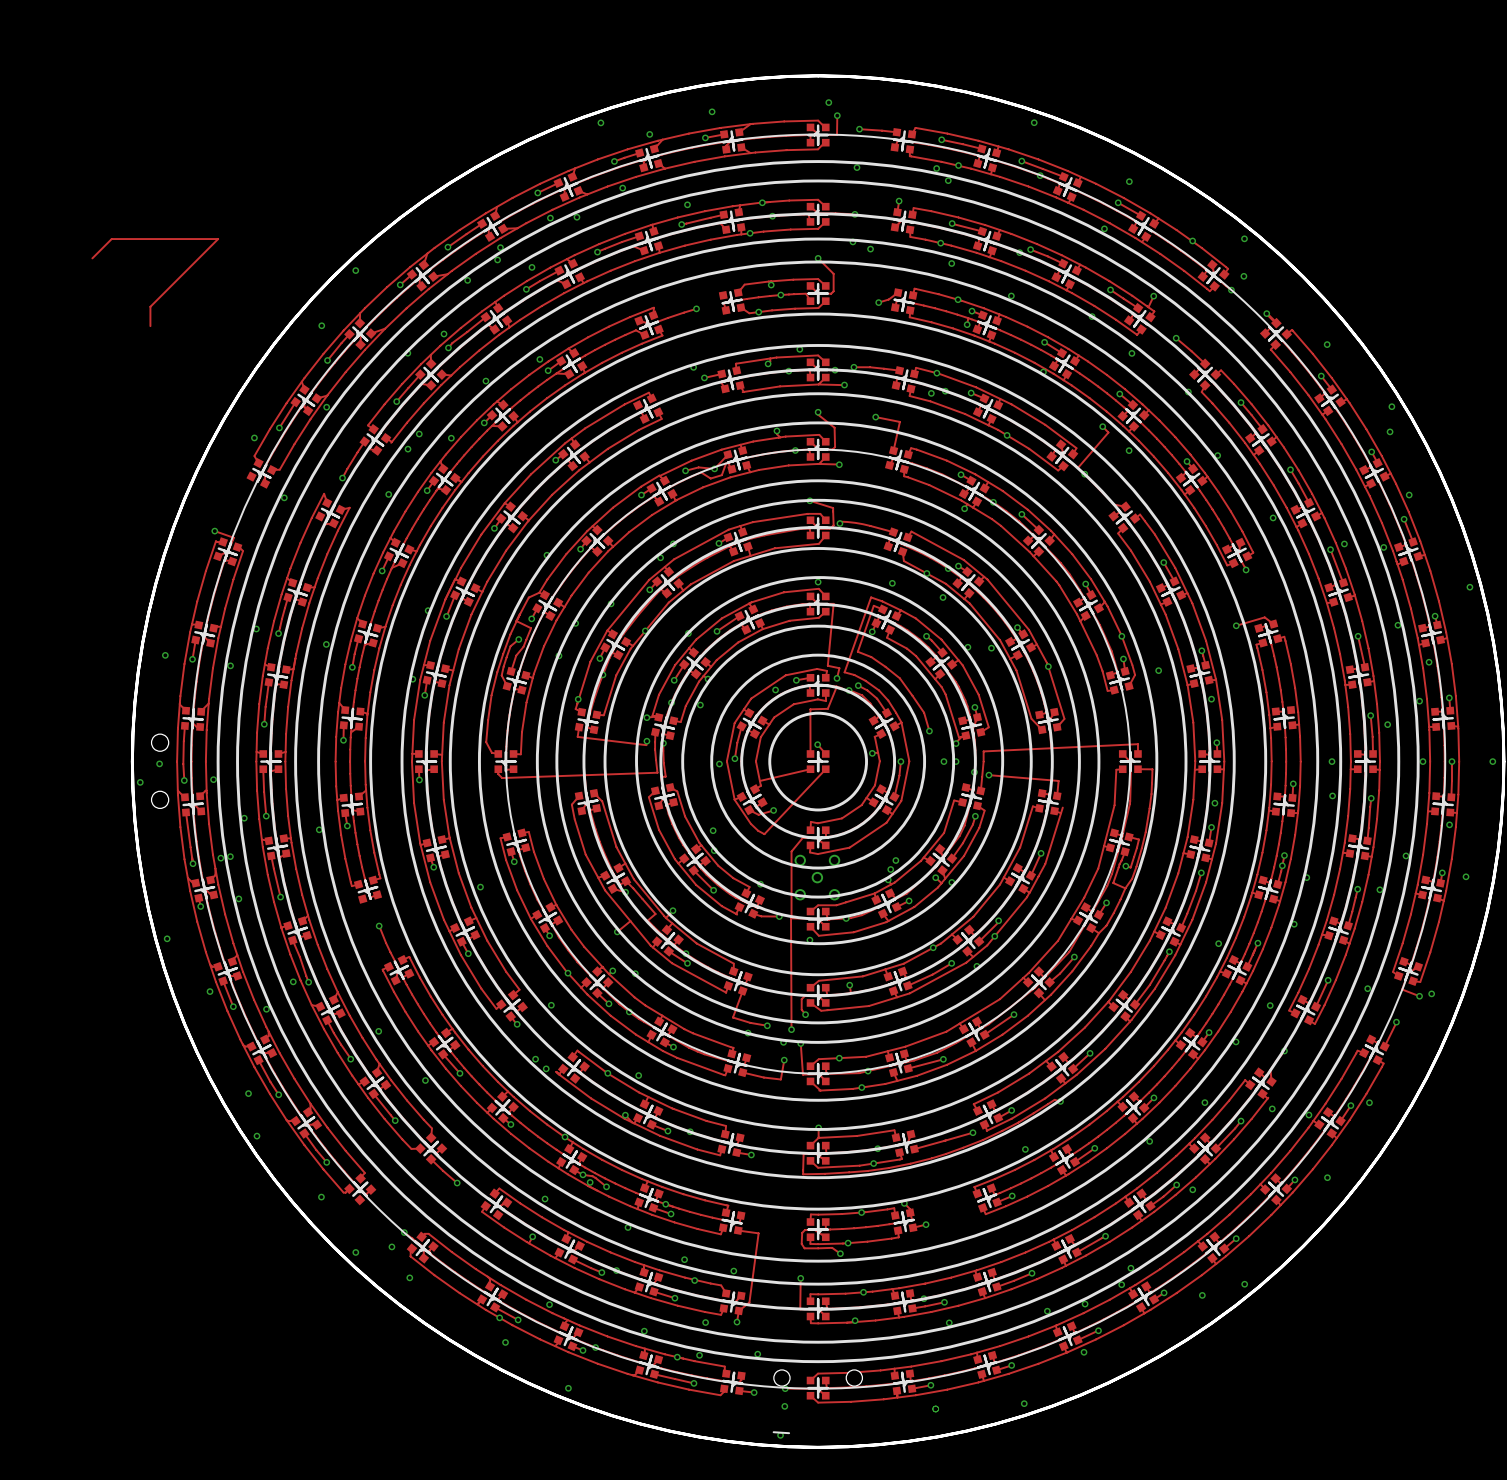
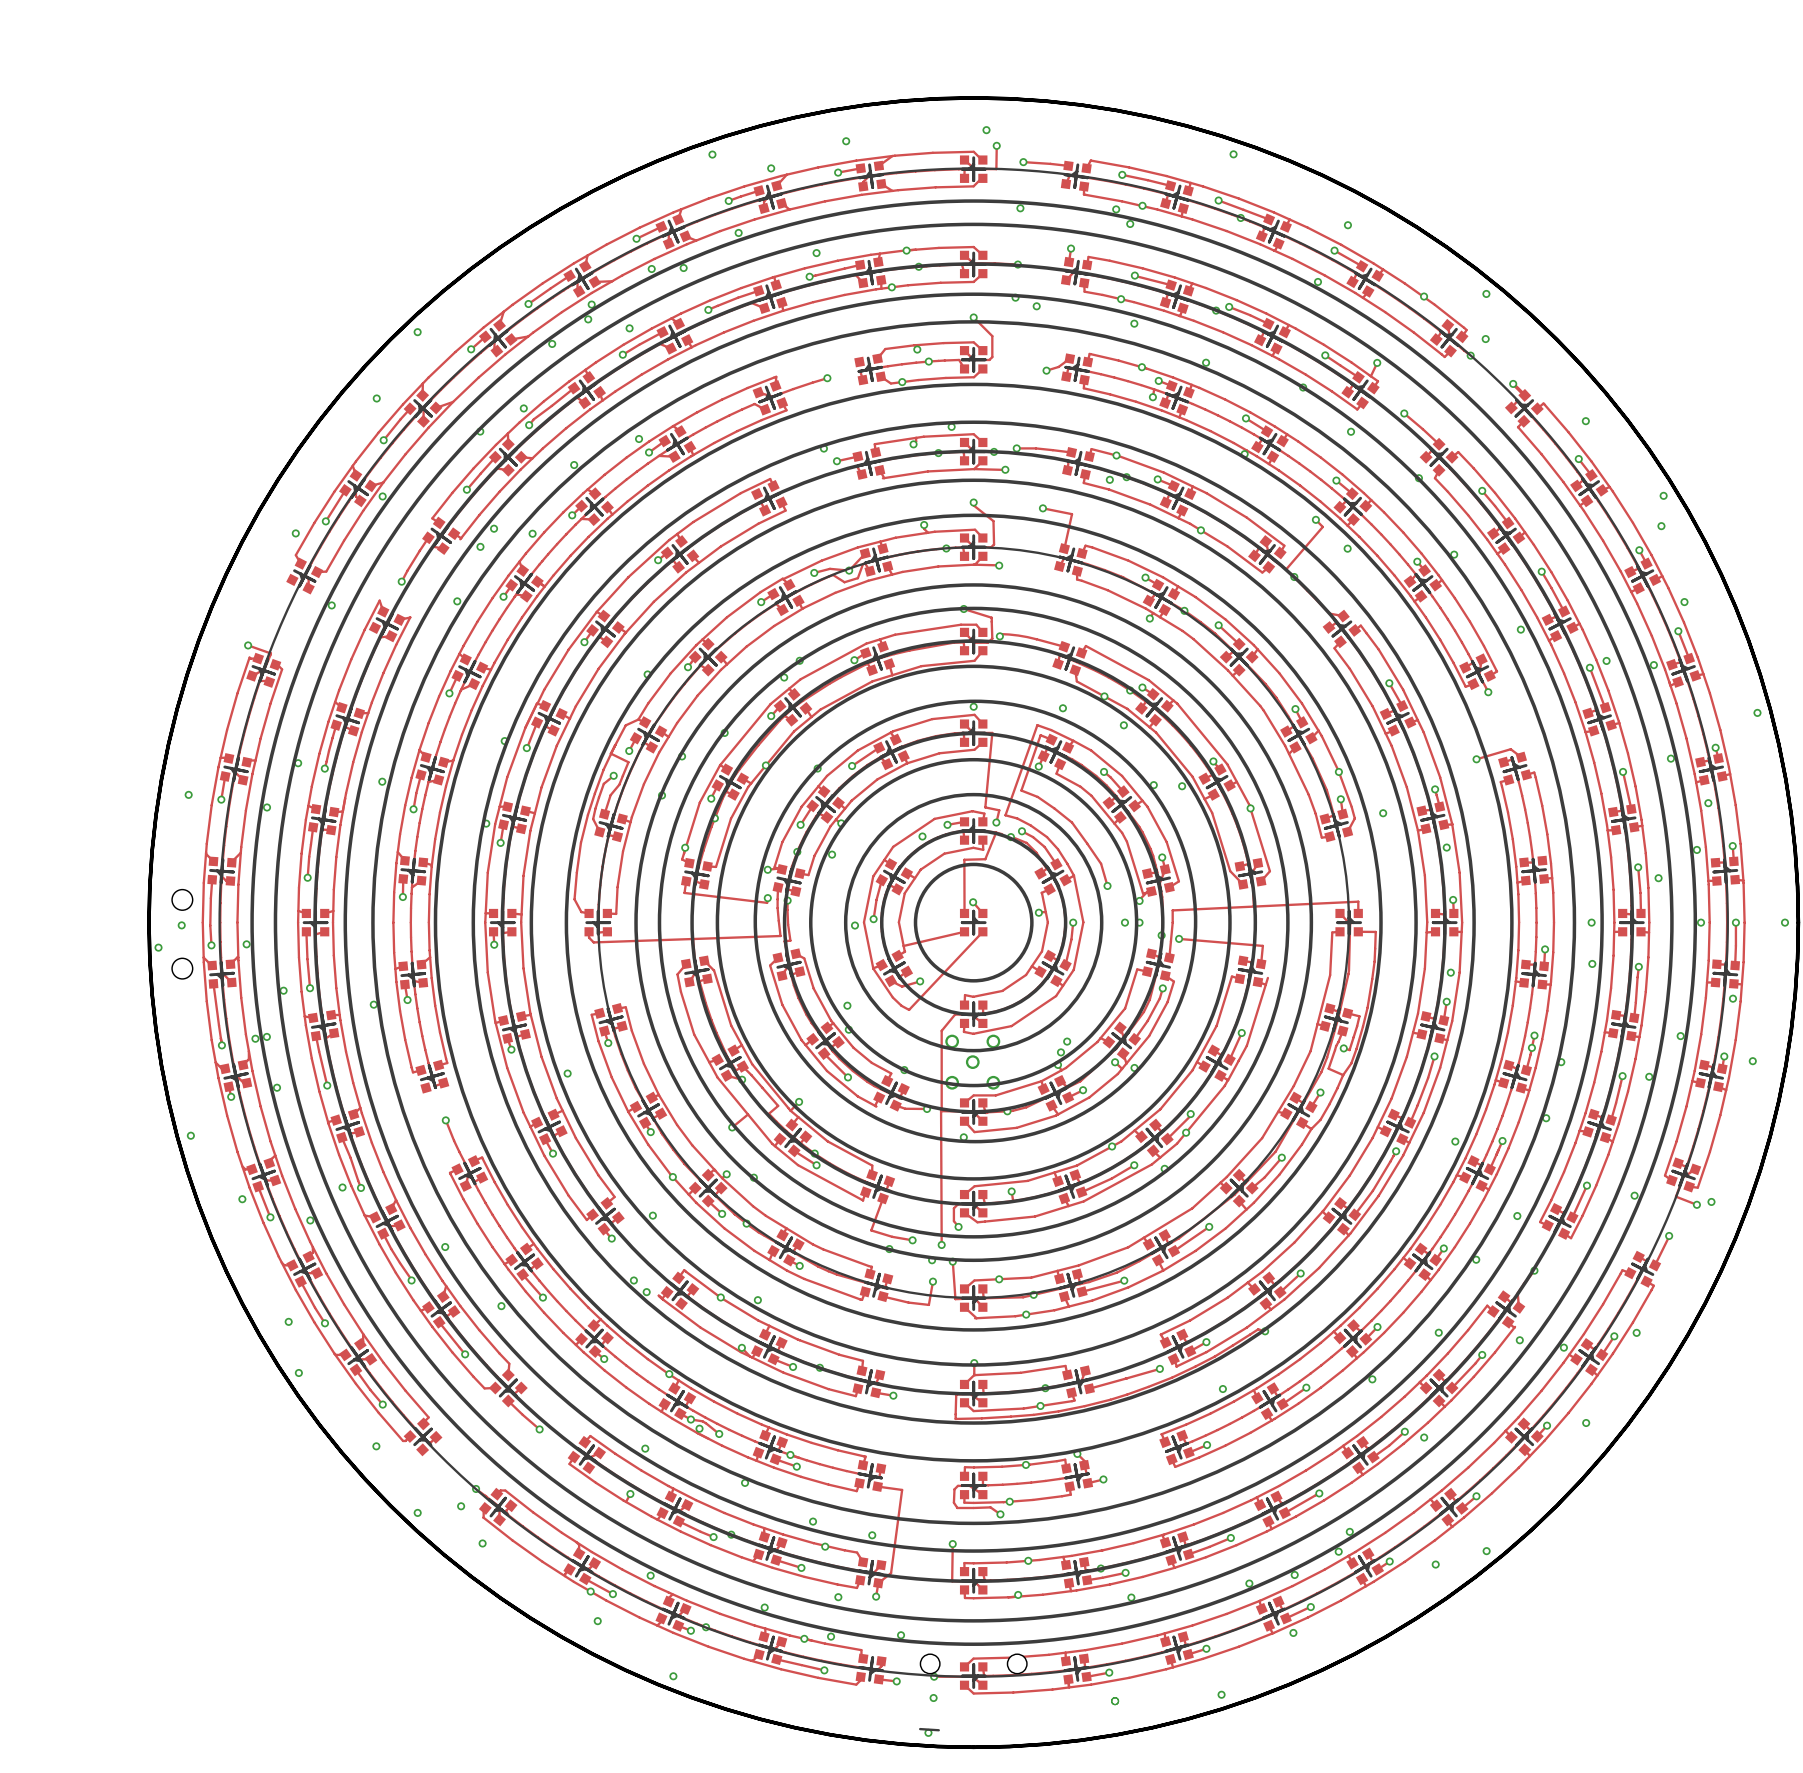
track: (92, 258) (111, 239) (218, 239) (150, 306) (150, 326) -> none

